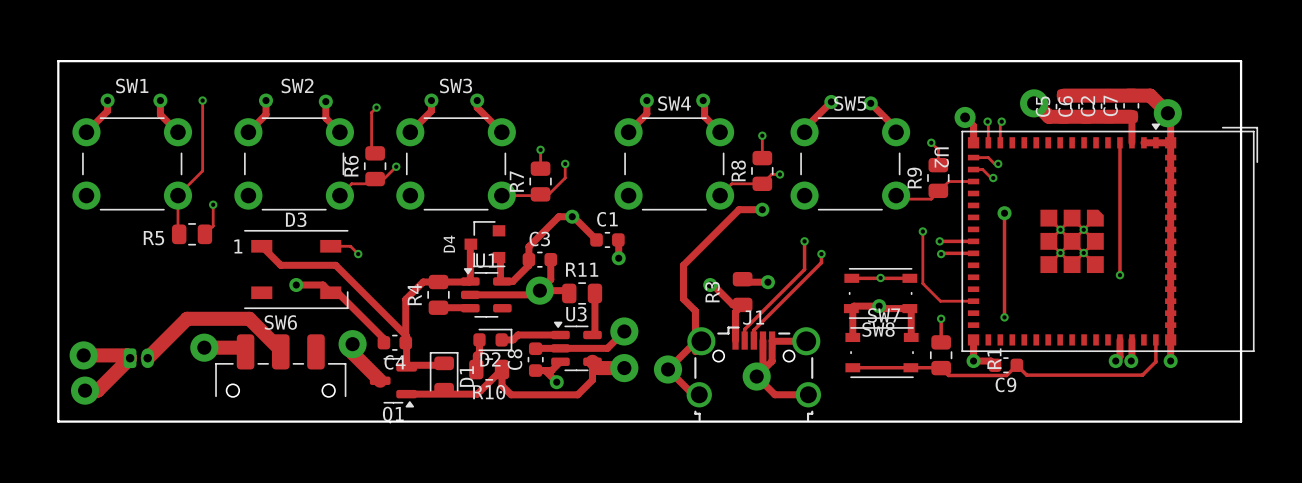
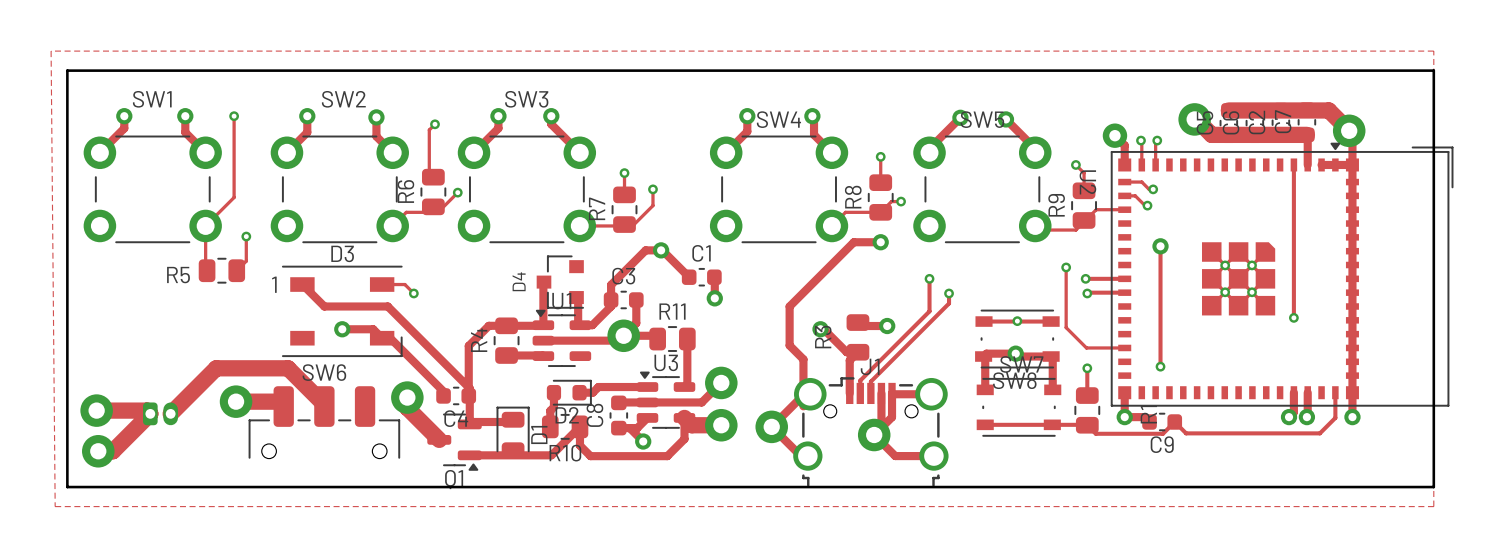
zone outline: none -> (51, 51) (1433, 51) (1433, 506) (55, 506) (51, 51)

